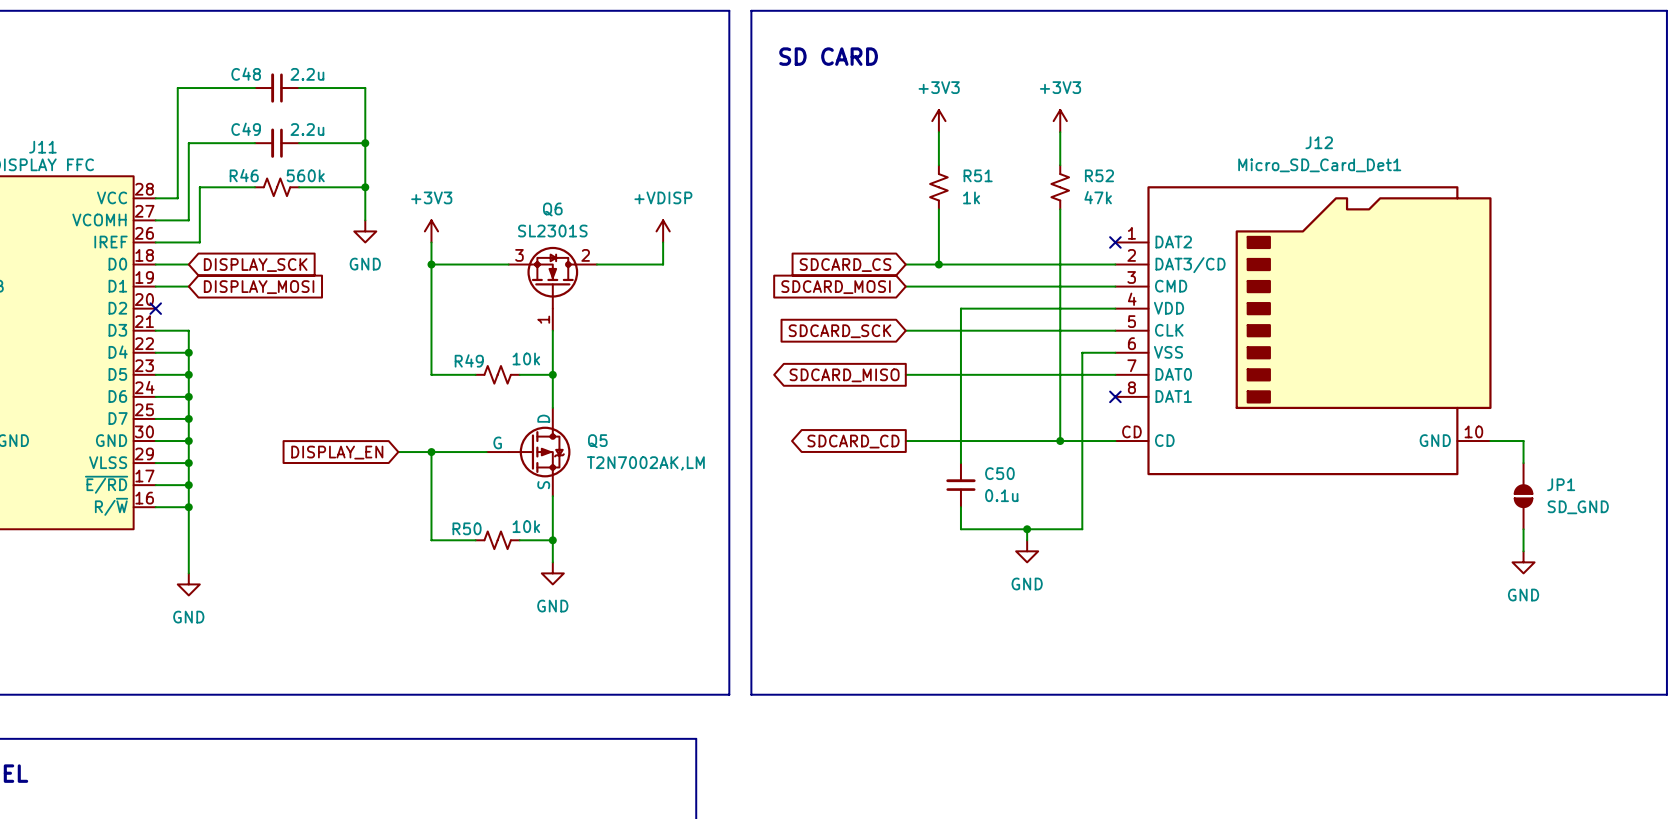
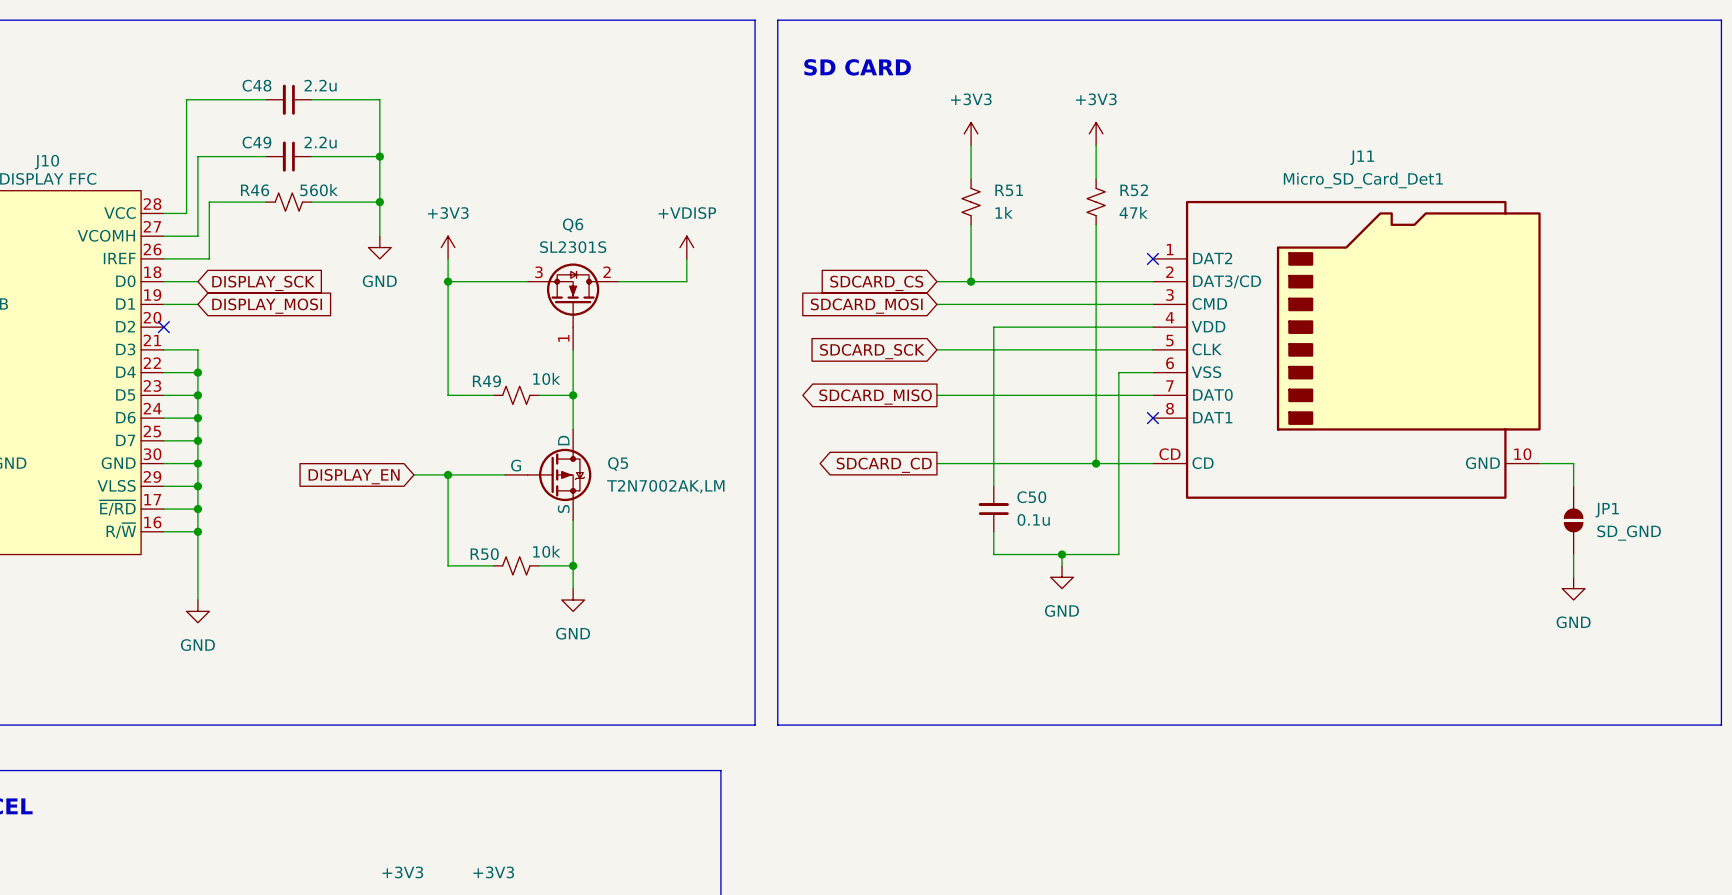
J12 name: J12 (1319, 142) -> J11 (1362, 157)
J11 name: J11 (42, 147) -> J10 (46, 162)

